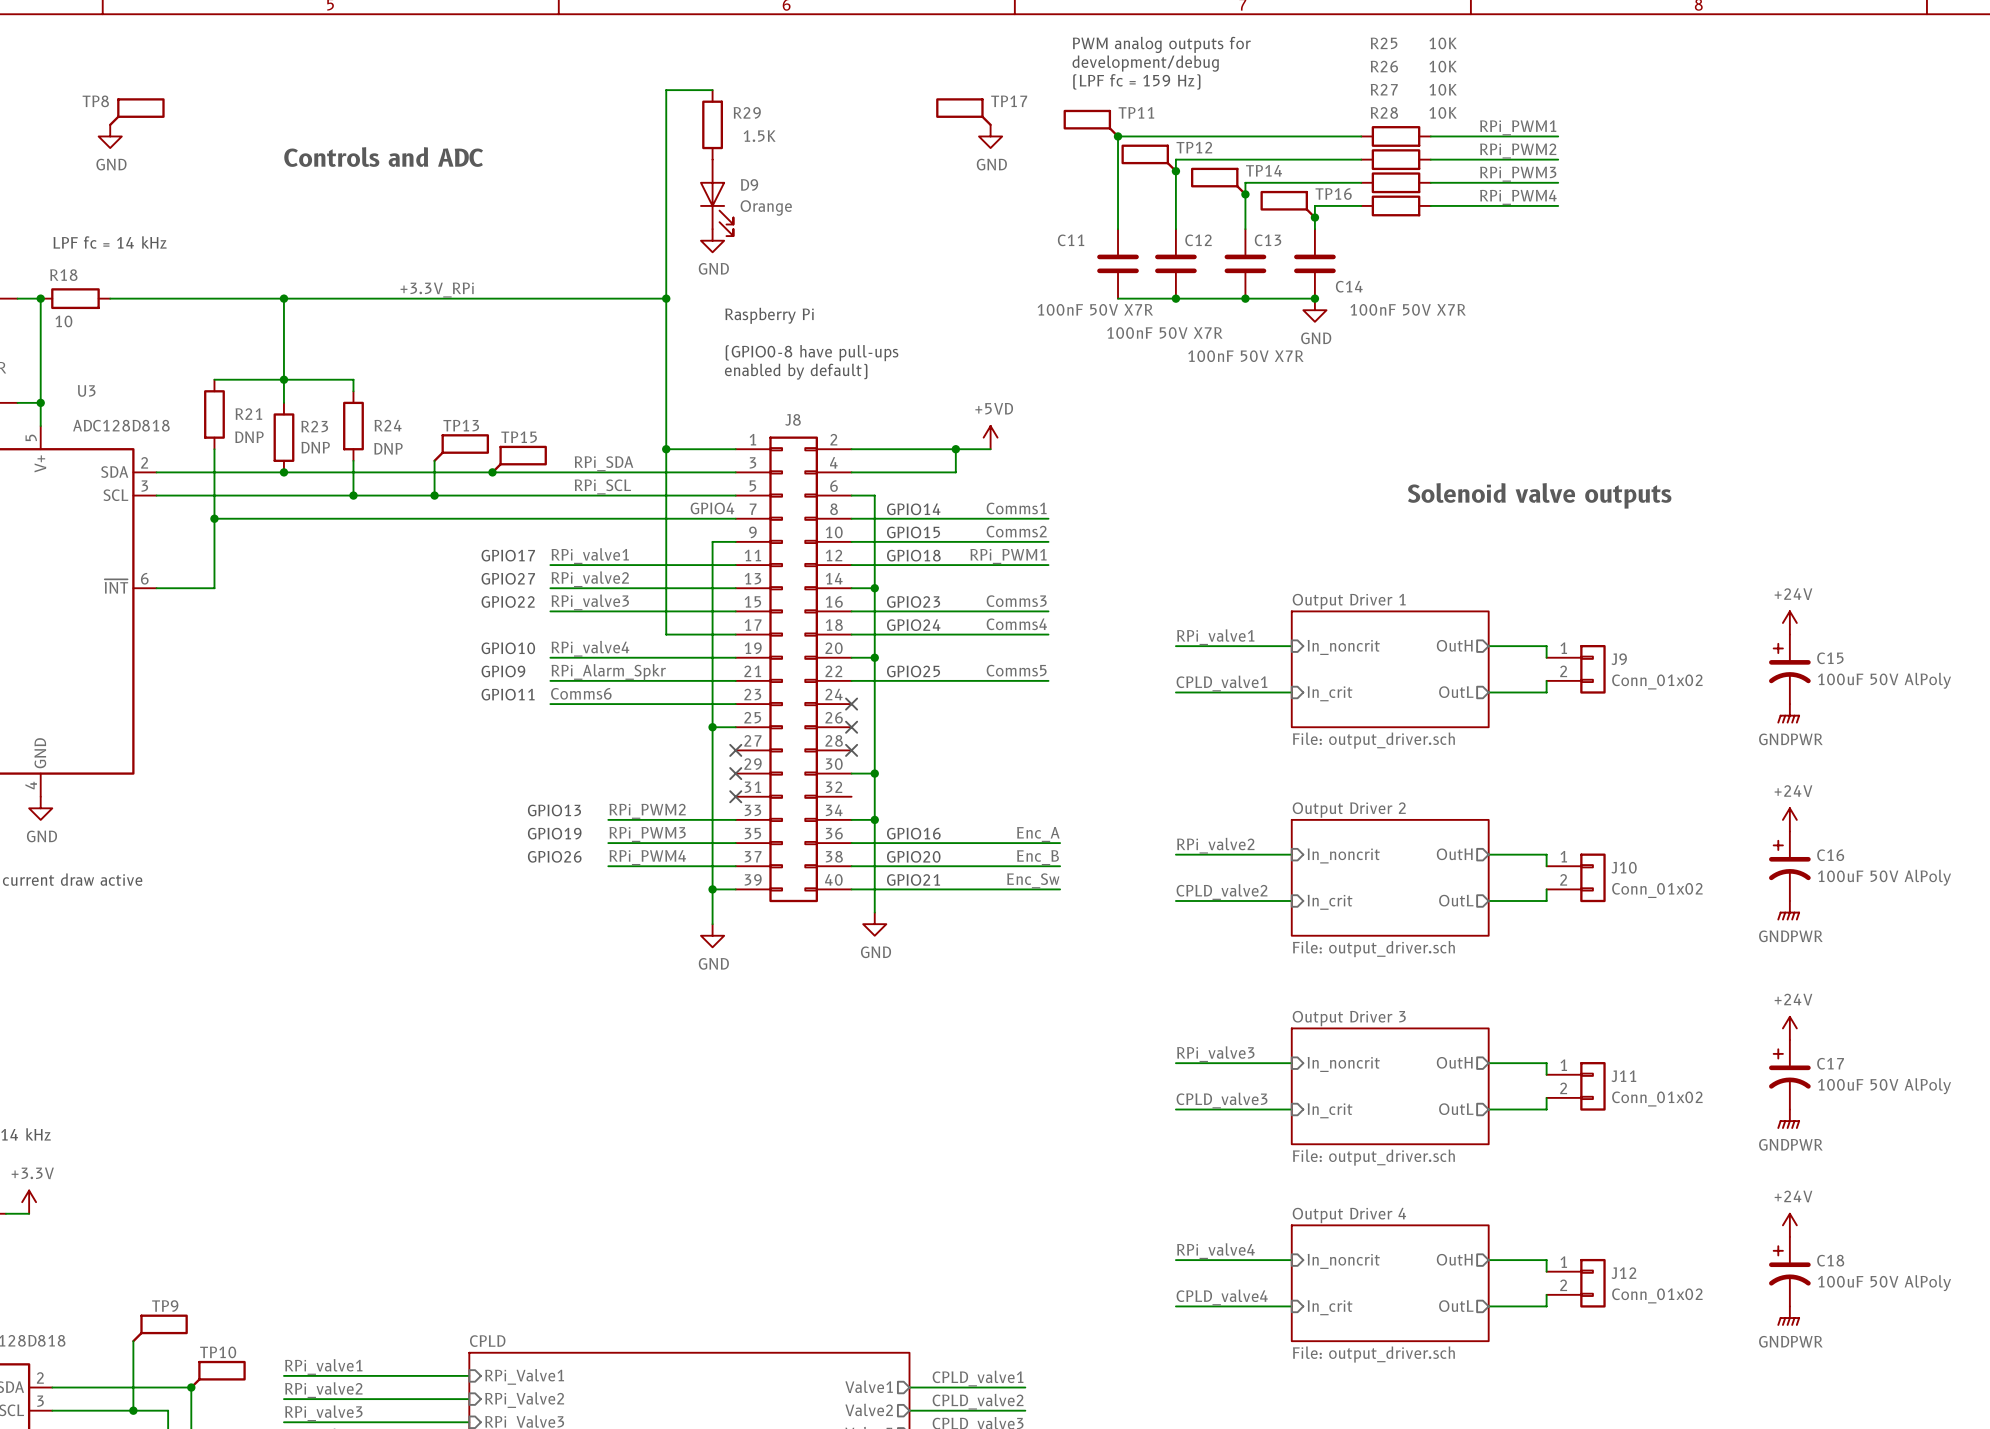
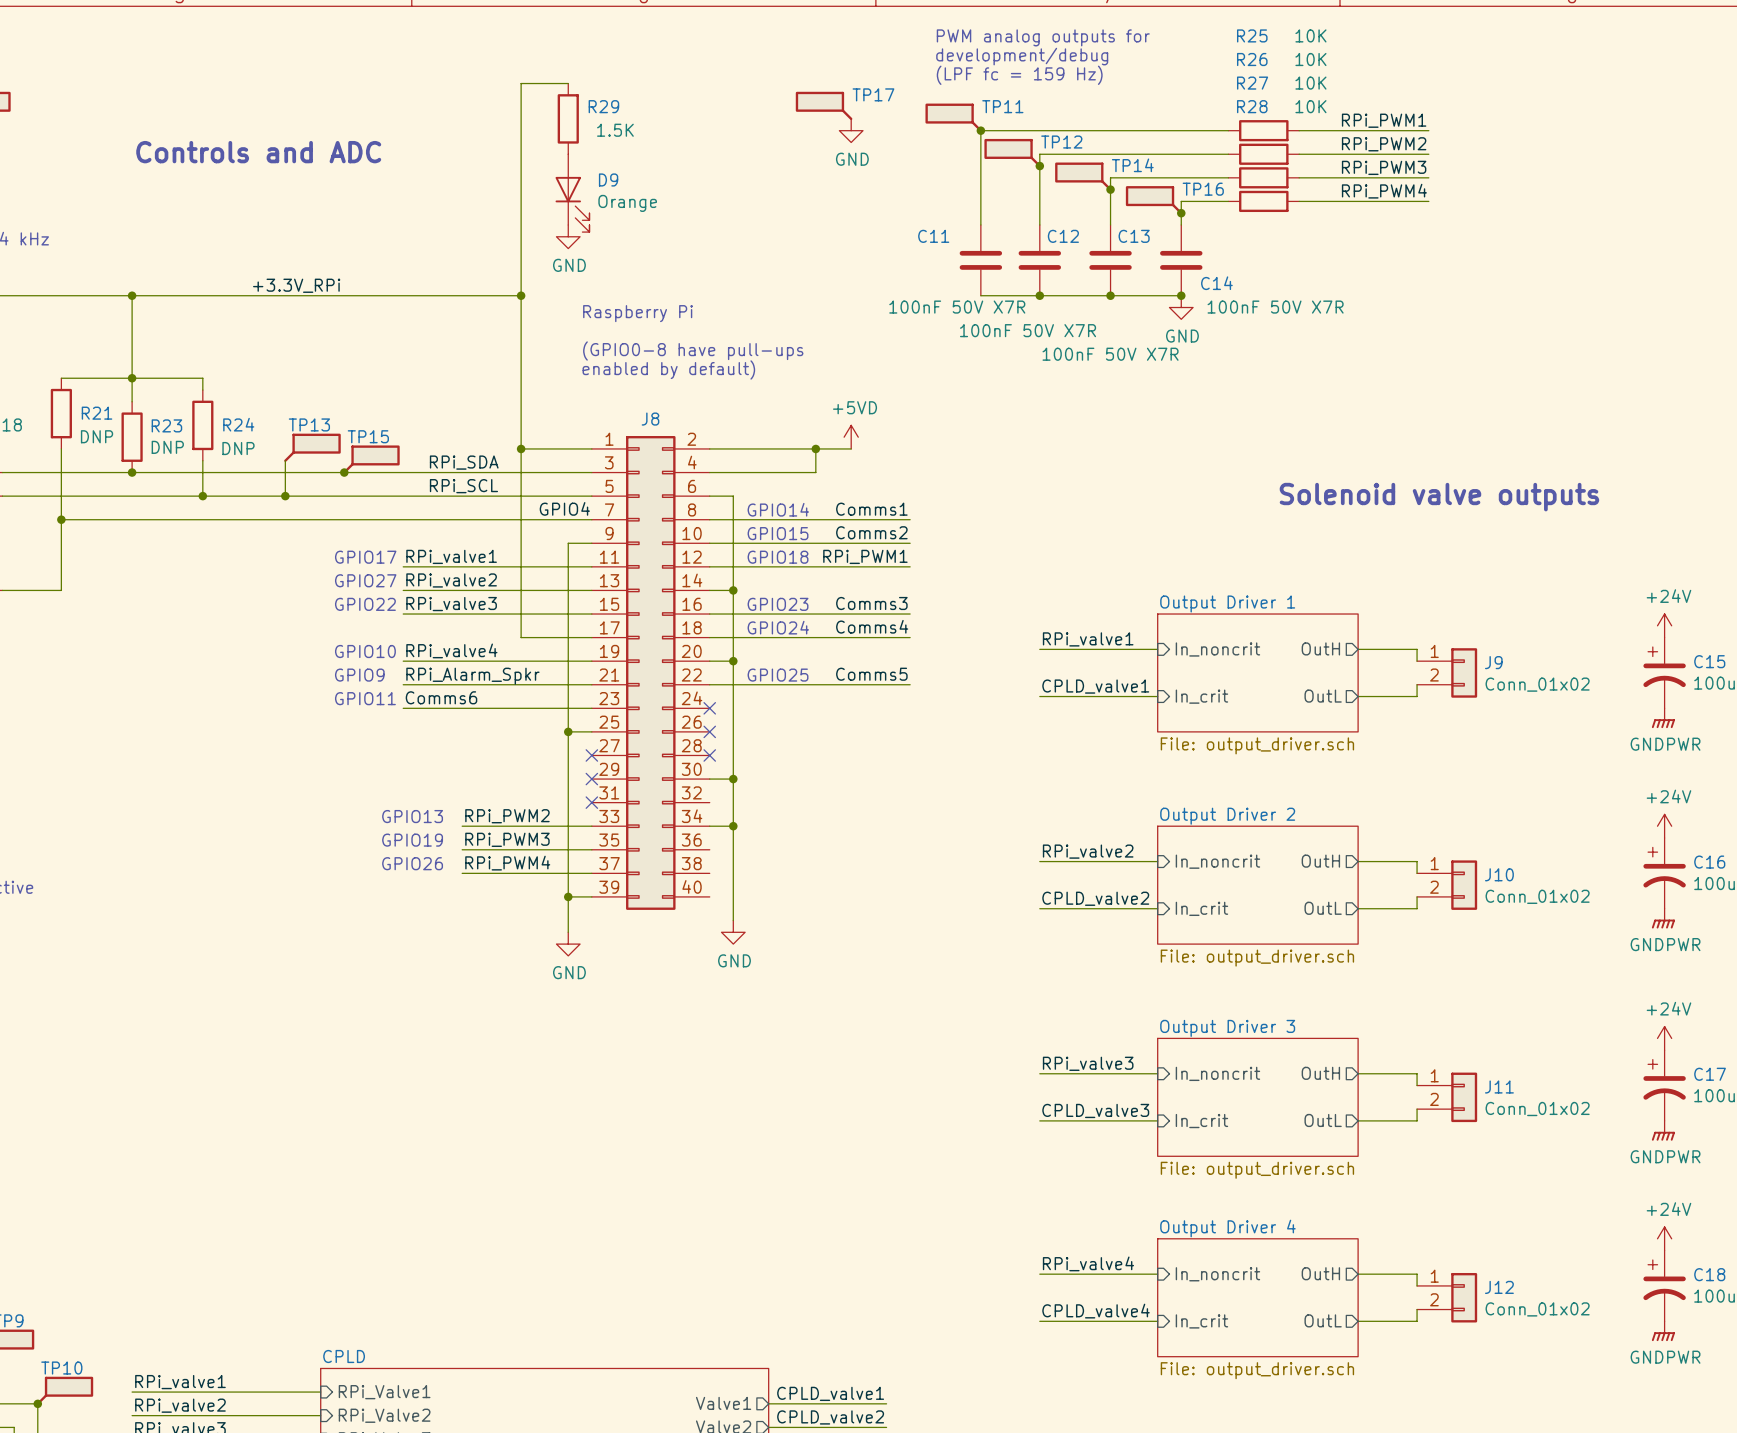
text: GPIO16 (913, 833) -> none
label: Enc_A (1038, 834) -> none
wire: (851, 843) (1060, 843) -> none
text: GPIO20 (913, 856) -> none
label: Enc_B (1038, 857) -> none
wire: (851, 866) (1060, 866) -> none
text: GPIO21 (913, 879) -> none
label: Enc_Sw (1033, 880) -> none
wire: (851, 889) (1060, 889) -> none

